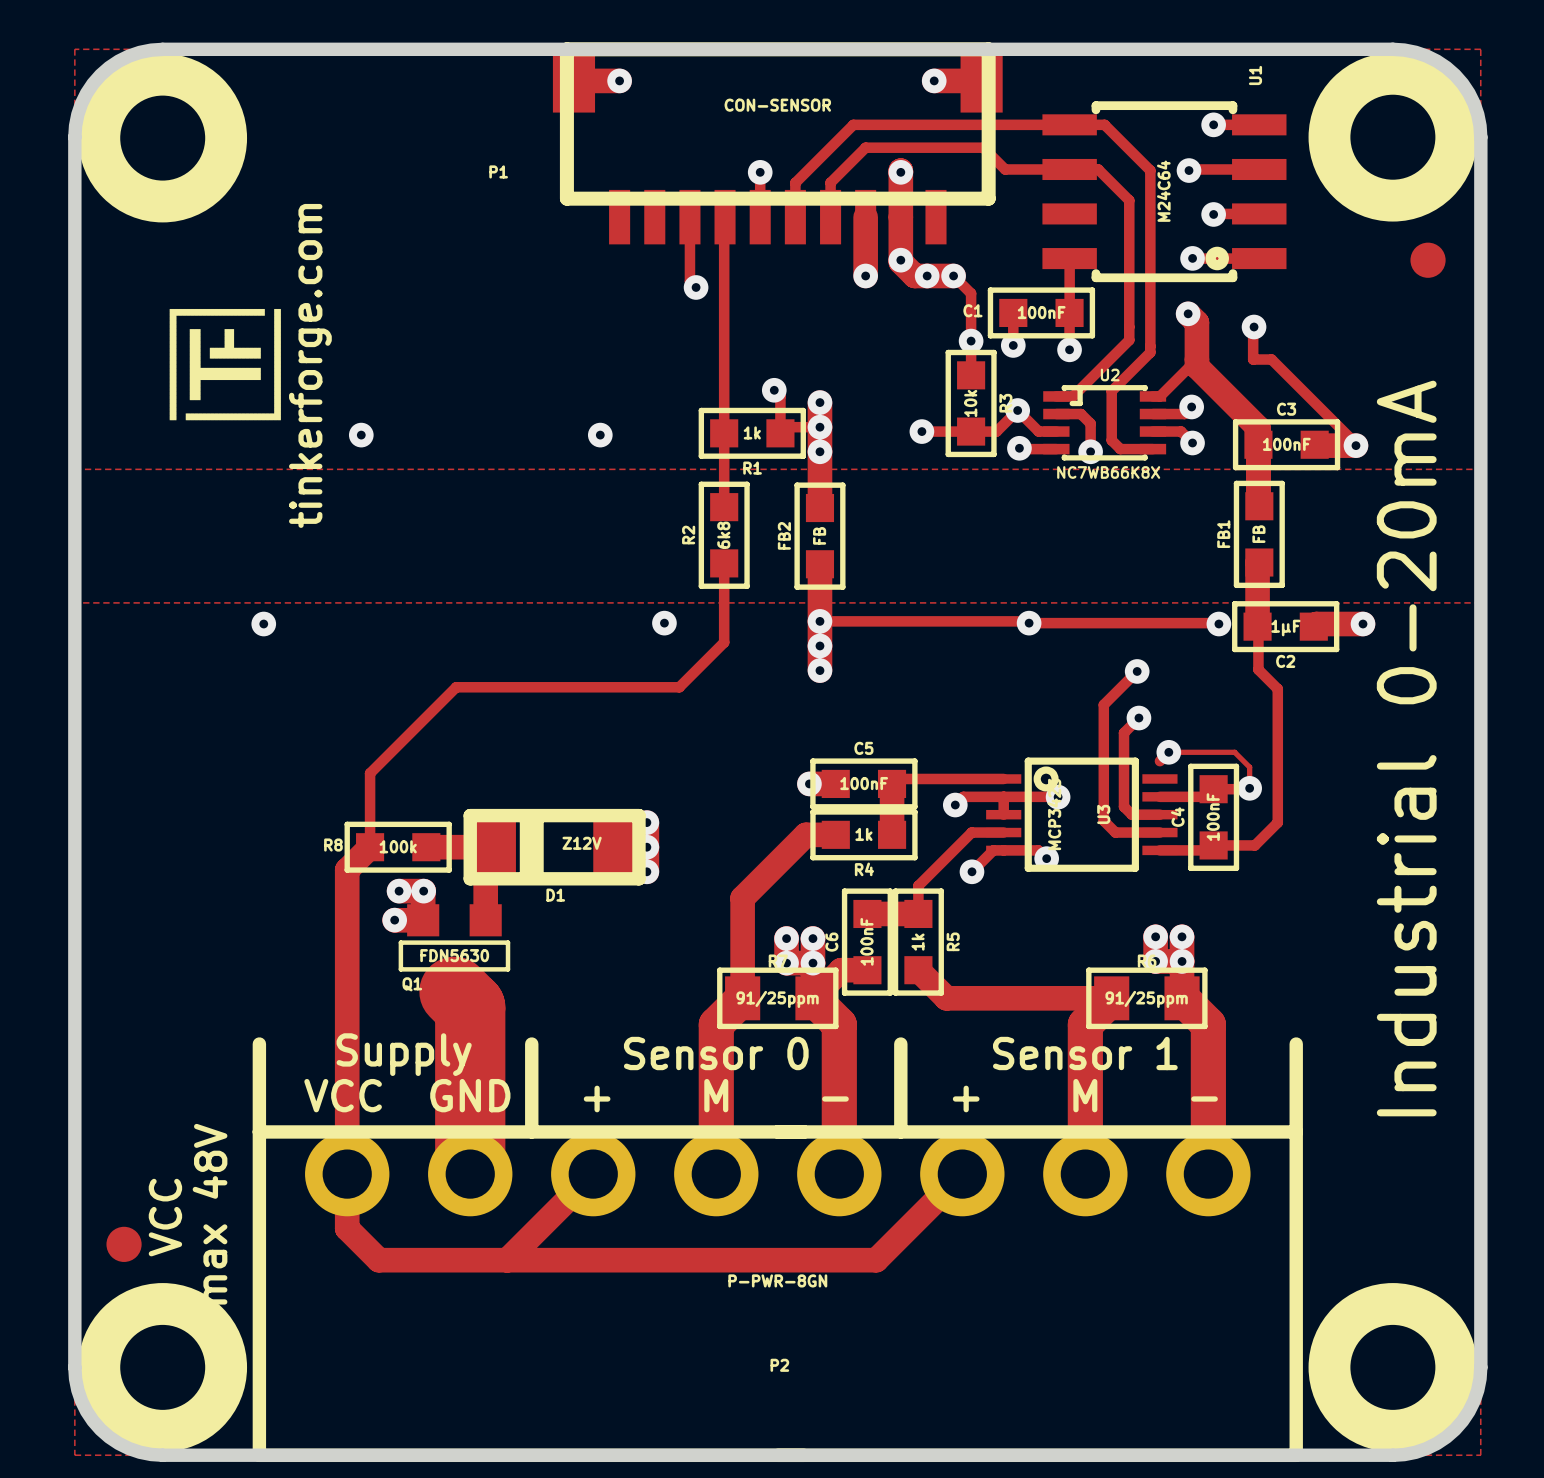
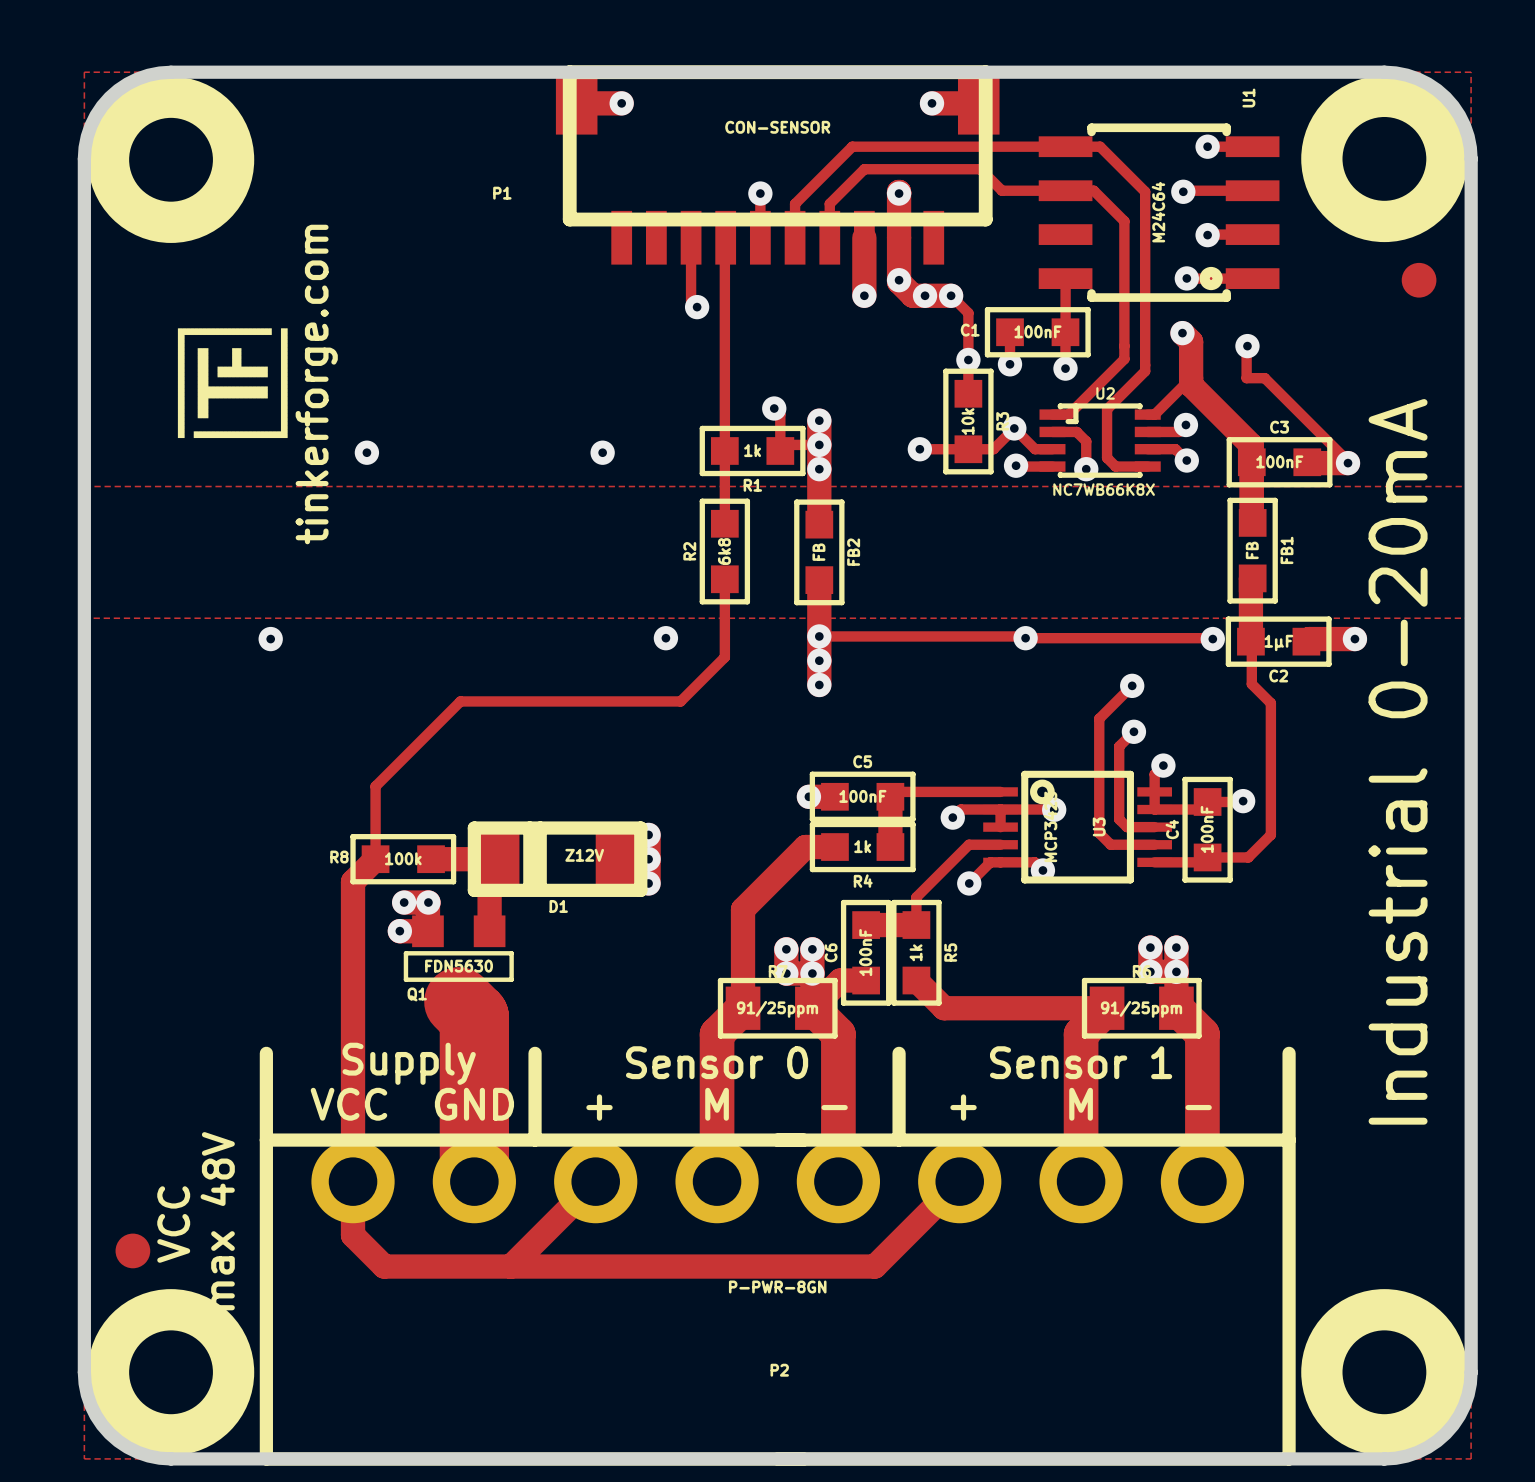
FB1 name position: FB1 (1223, 534) -> FB1 (1286, 550)
FB2 name position: FB2 (784, 535) -> FB2 (853, 552)
track: (1168, 752) (1234, 752) (1249, 767) (1249, 788) -> none
track: none -> (1154, 774) (1154, 809)

